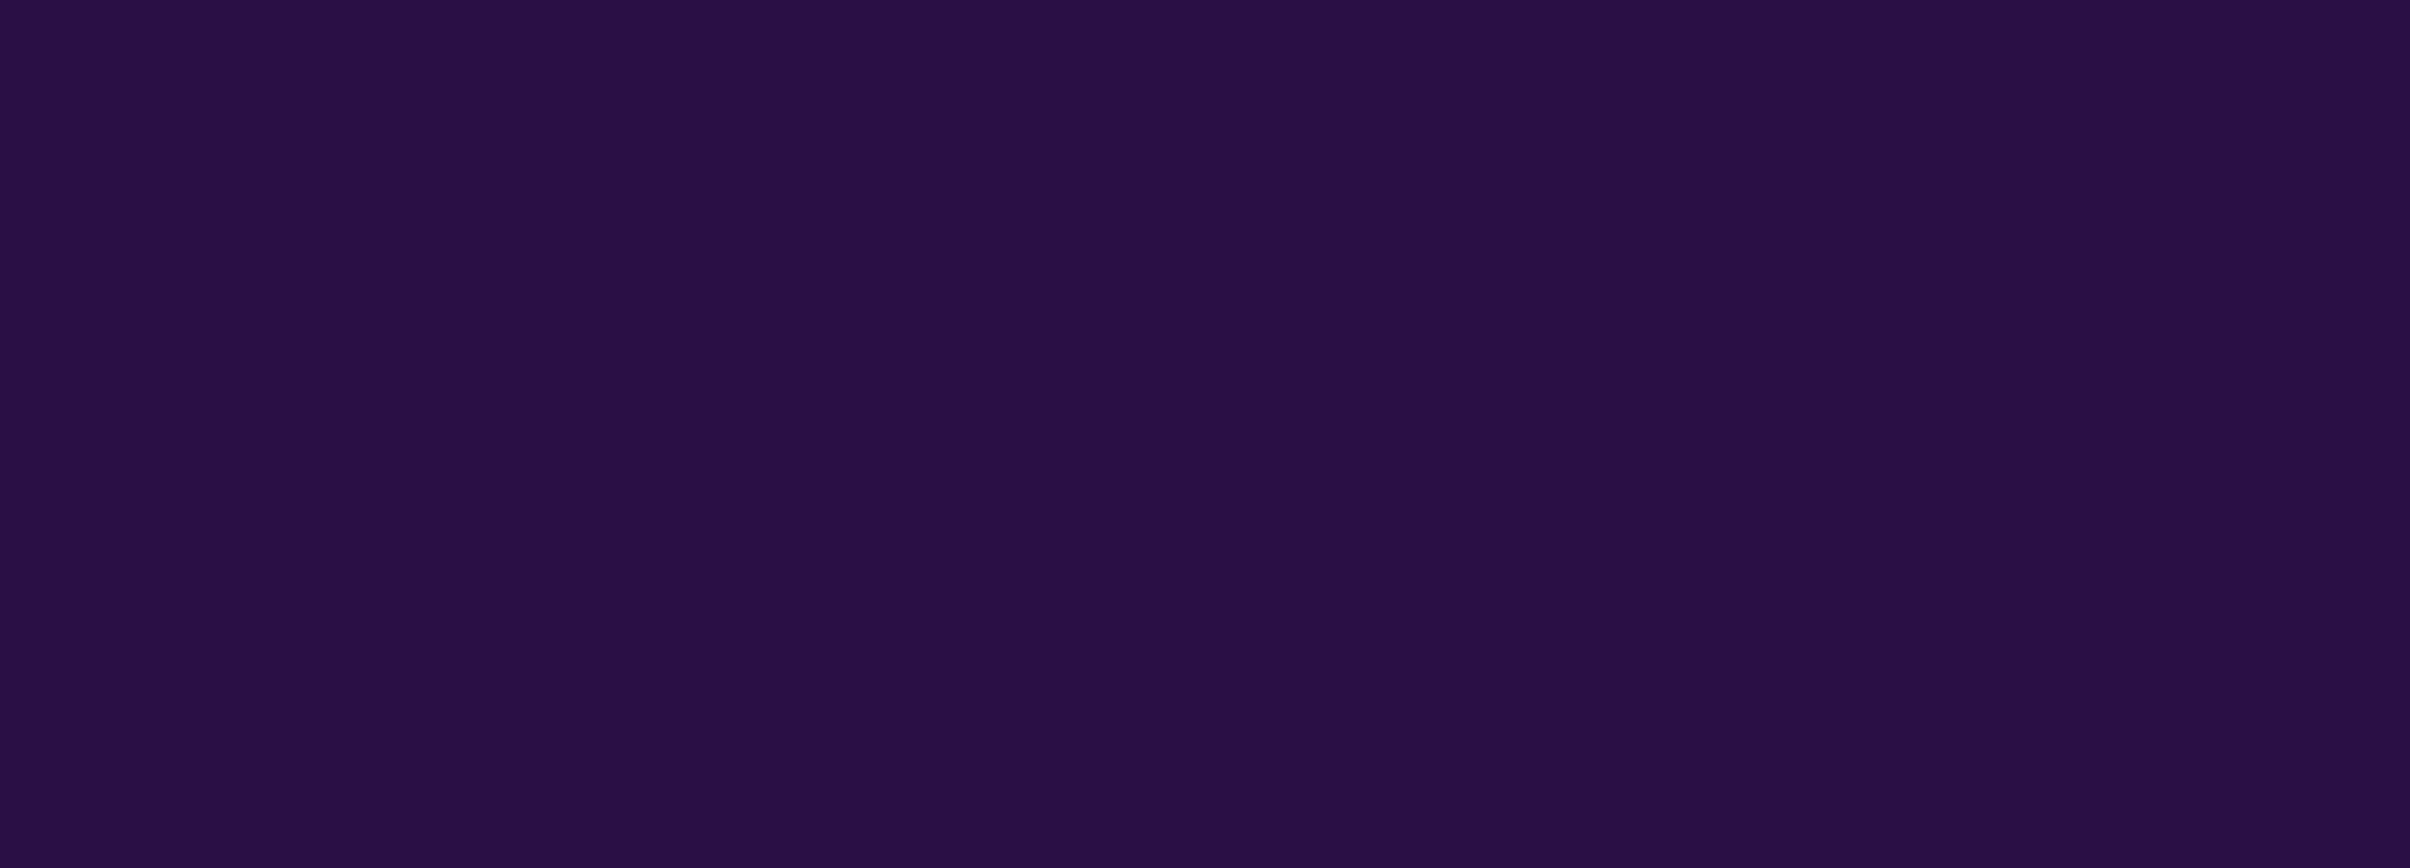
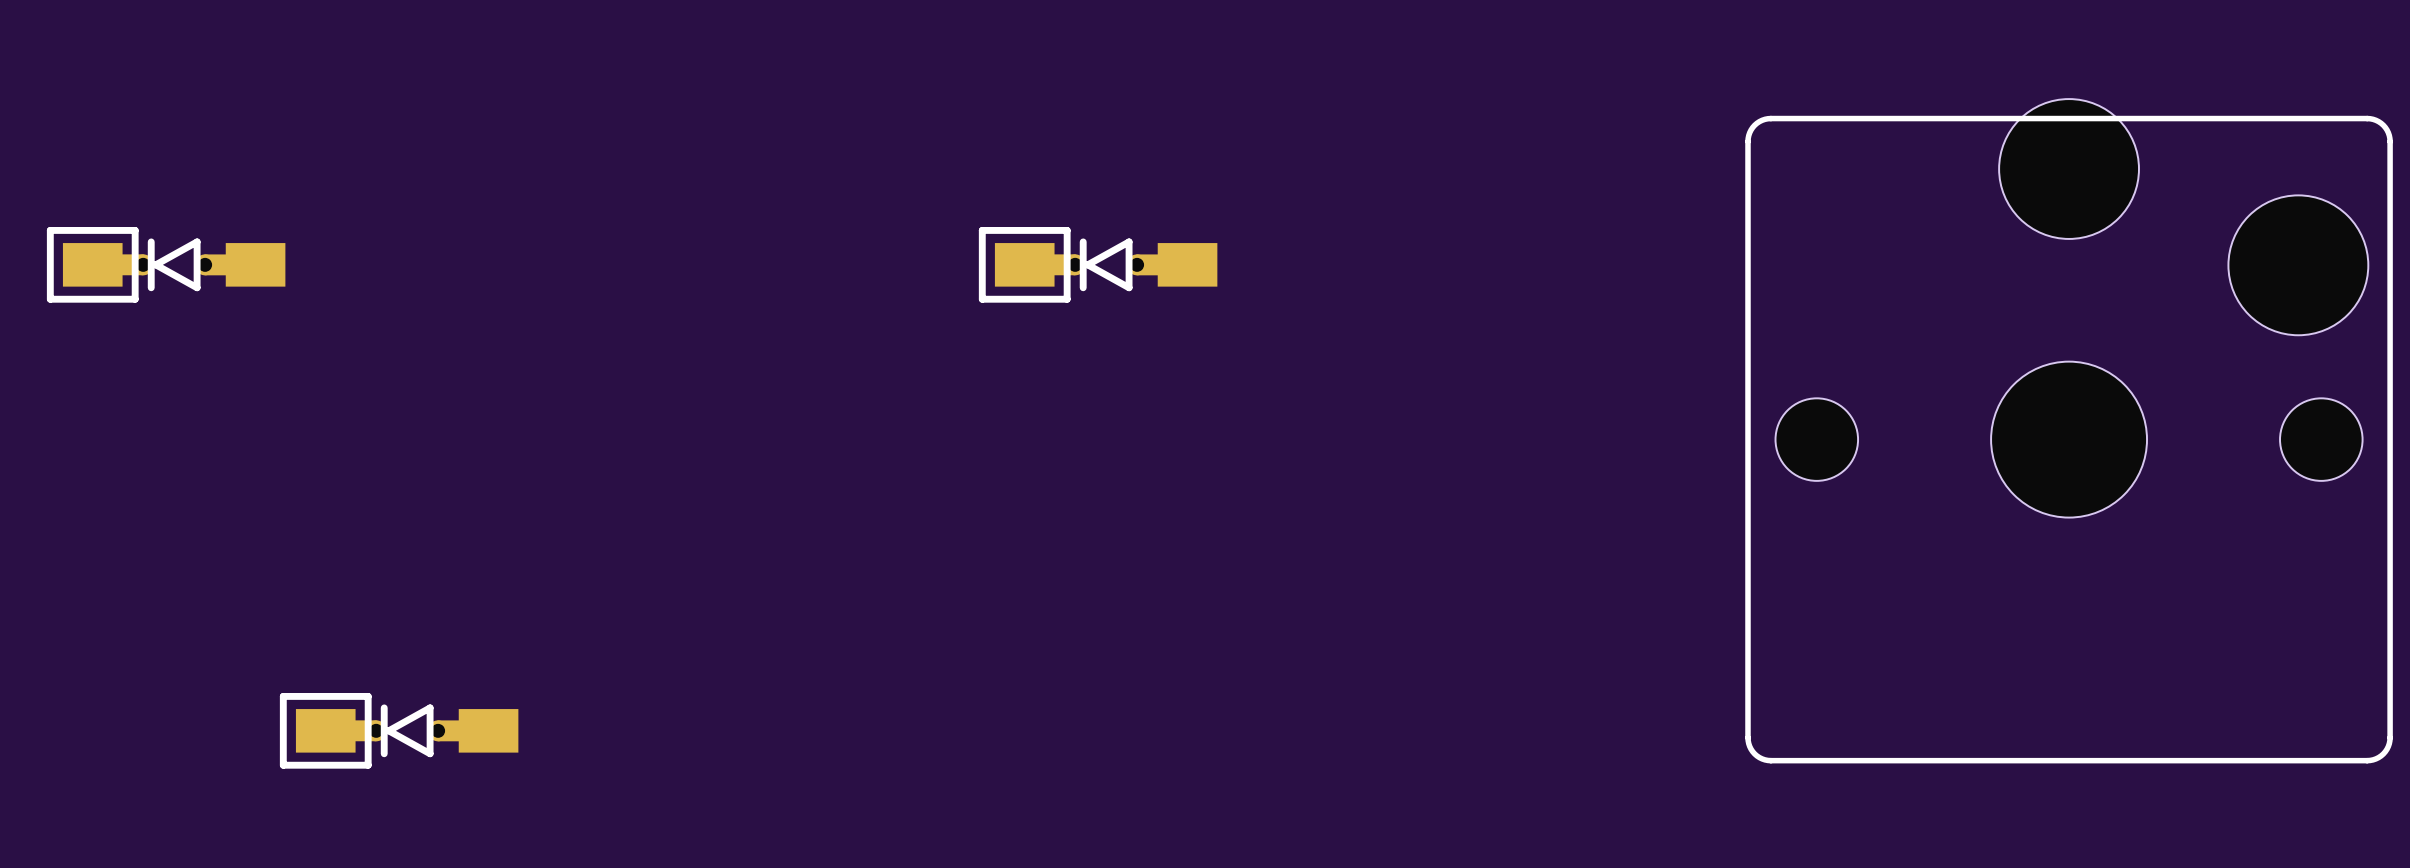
part: none -> (166, 264)
part: none -> (1098, 264)
part: none -> (2069, 431)
part: none -> (399, 730)

